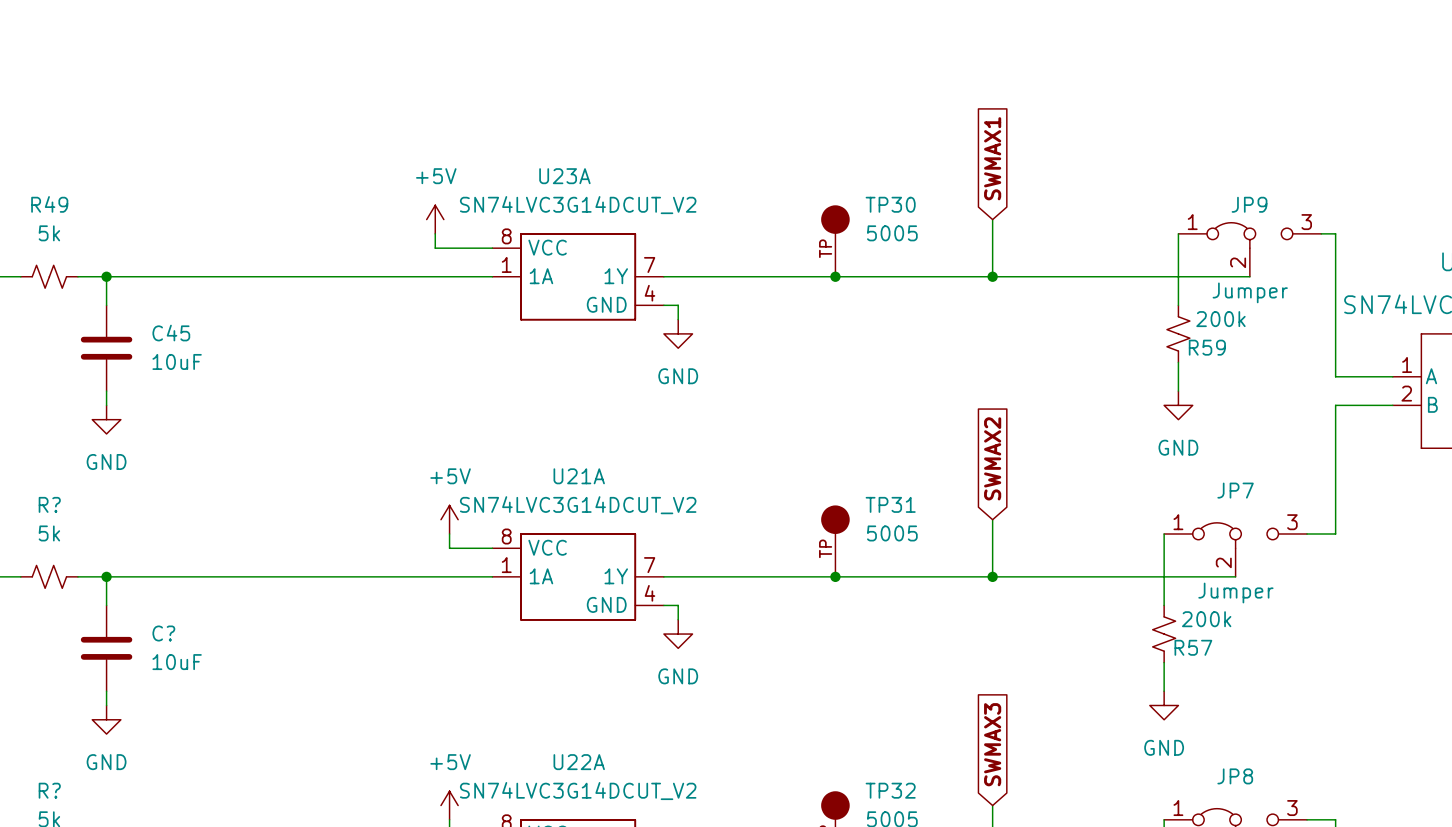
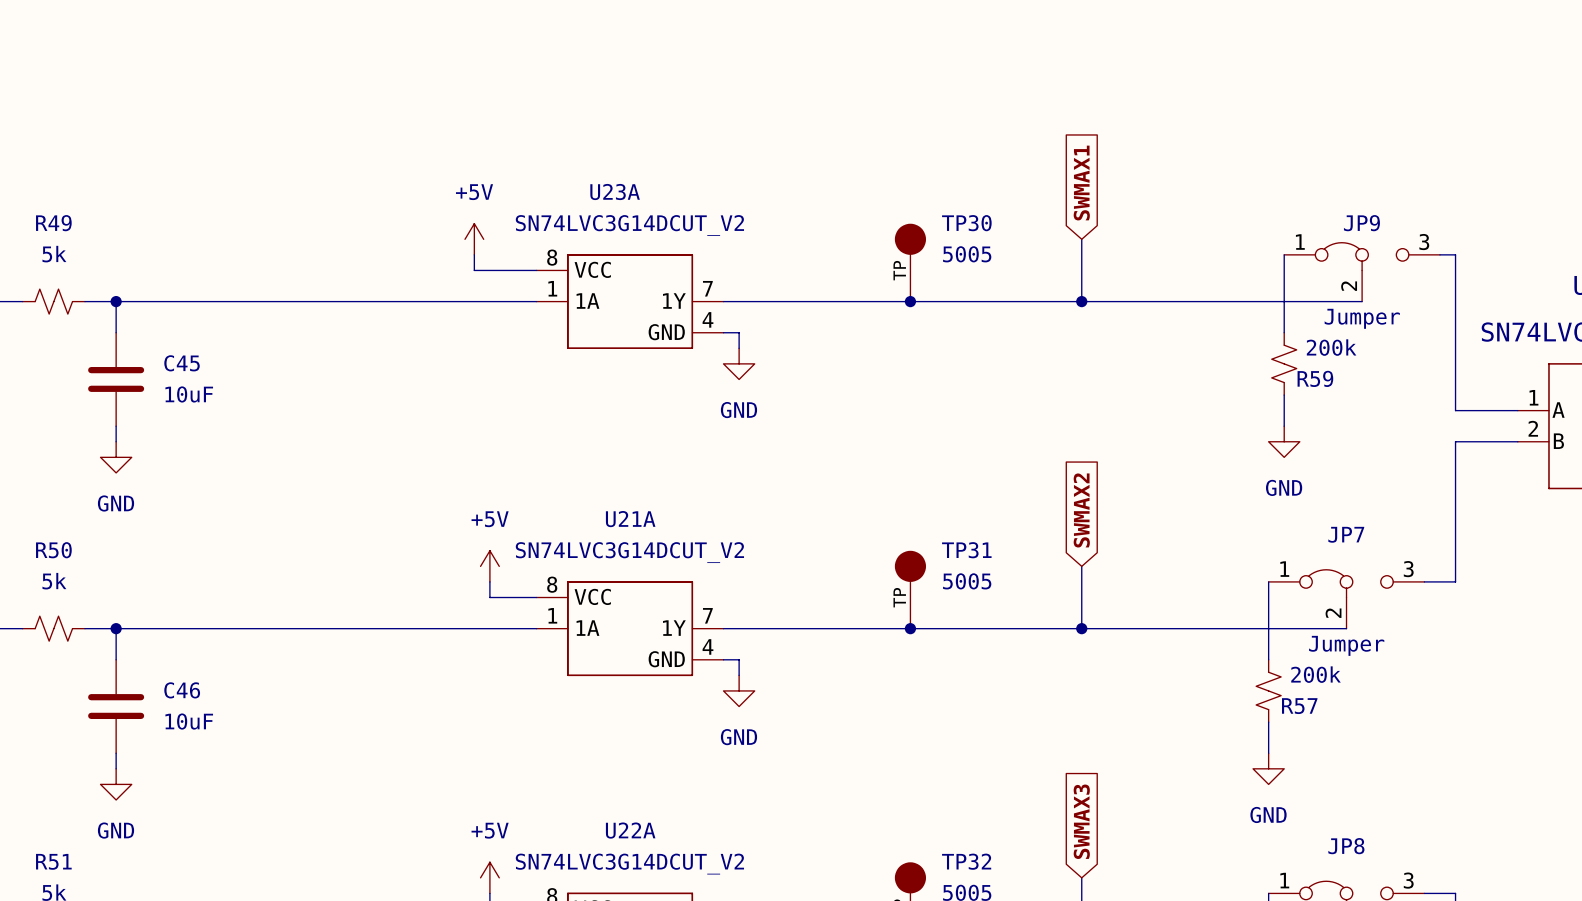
R? name: R? (49, 504) -> R50 (53, 550)
C? name: C? (163, 633) -> C46 (182, 690)
R? name: R? (49, 790) -> R51 (53, 861)

